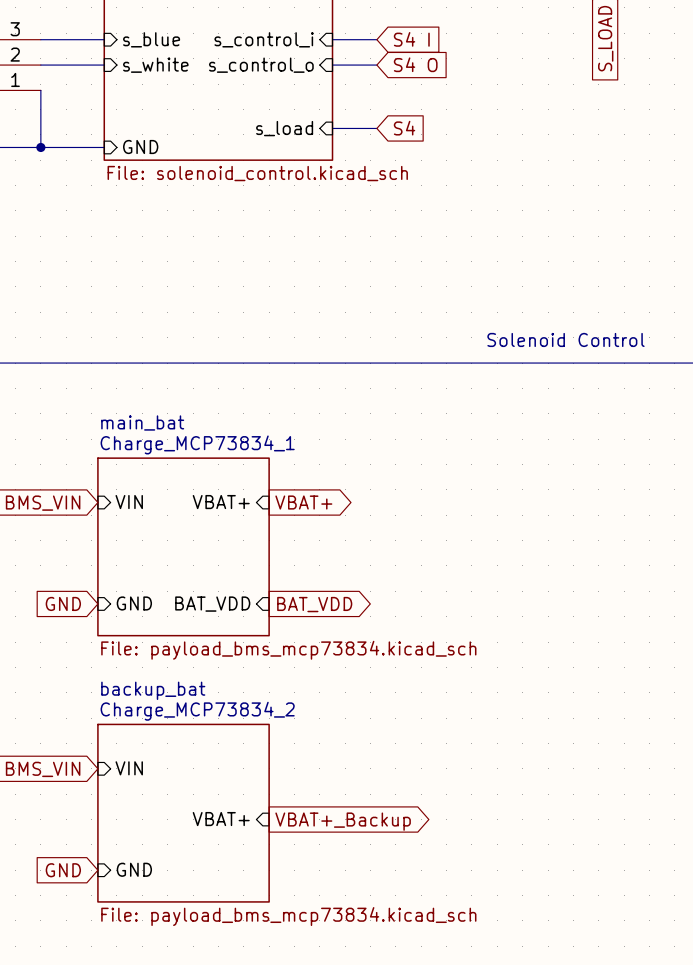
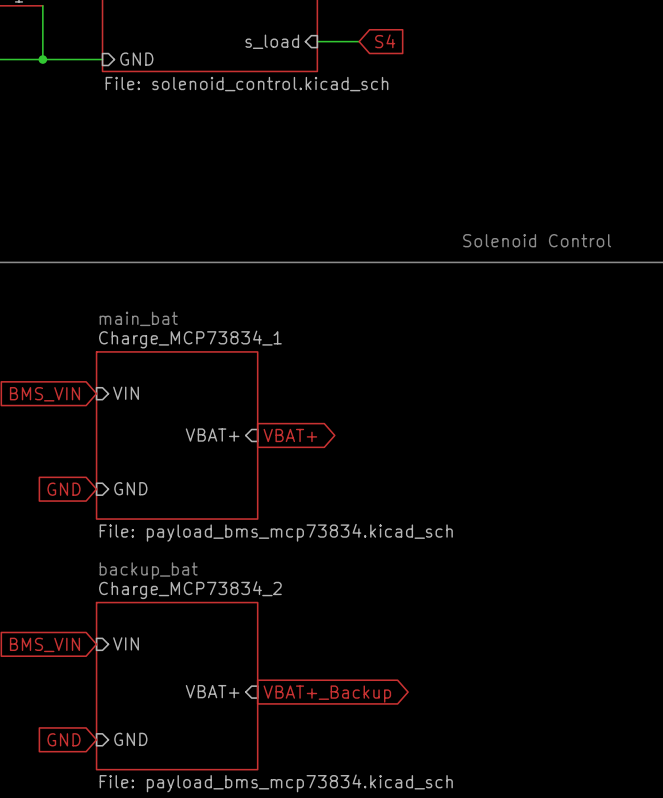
sheet pin position: VBAT+ (221, 502) -> VBAT+ (212, 435)
global label position: VBAT+ (303, 502) -> VBAT+ (290, 435)
sheet pin: BAT_VDD (212, 604) -> none
global label: BAT_VDD (314, 604) -> none

